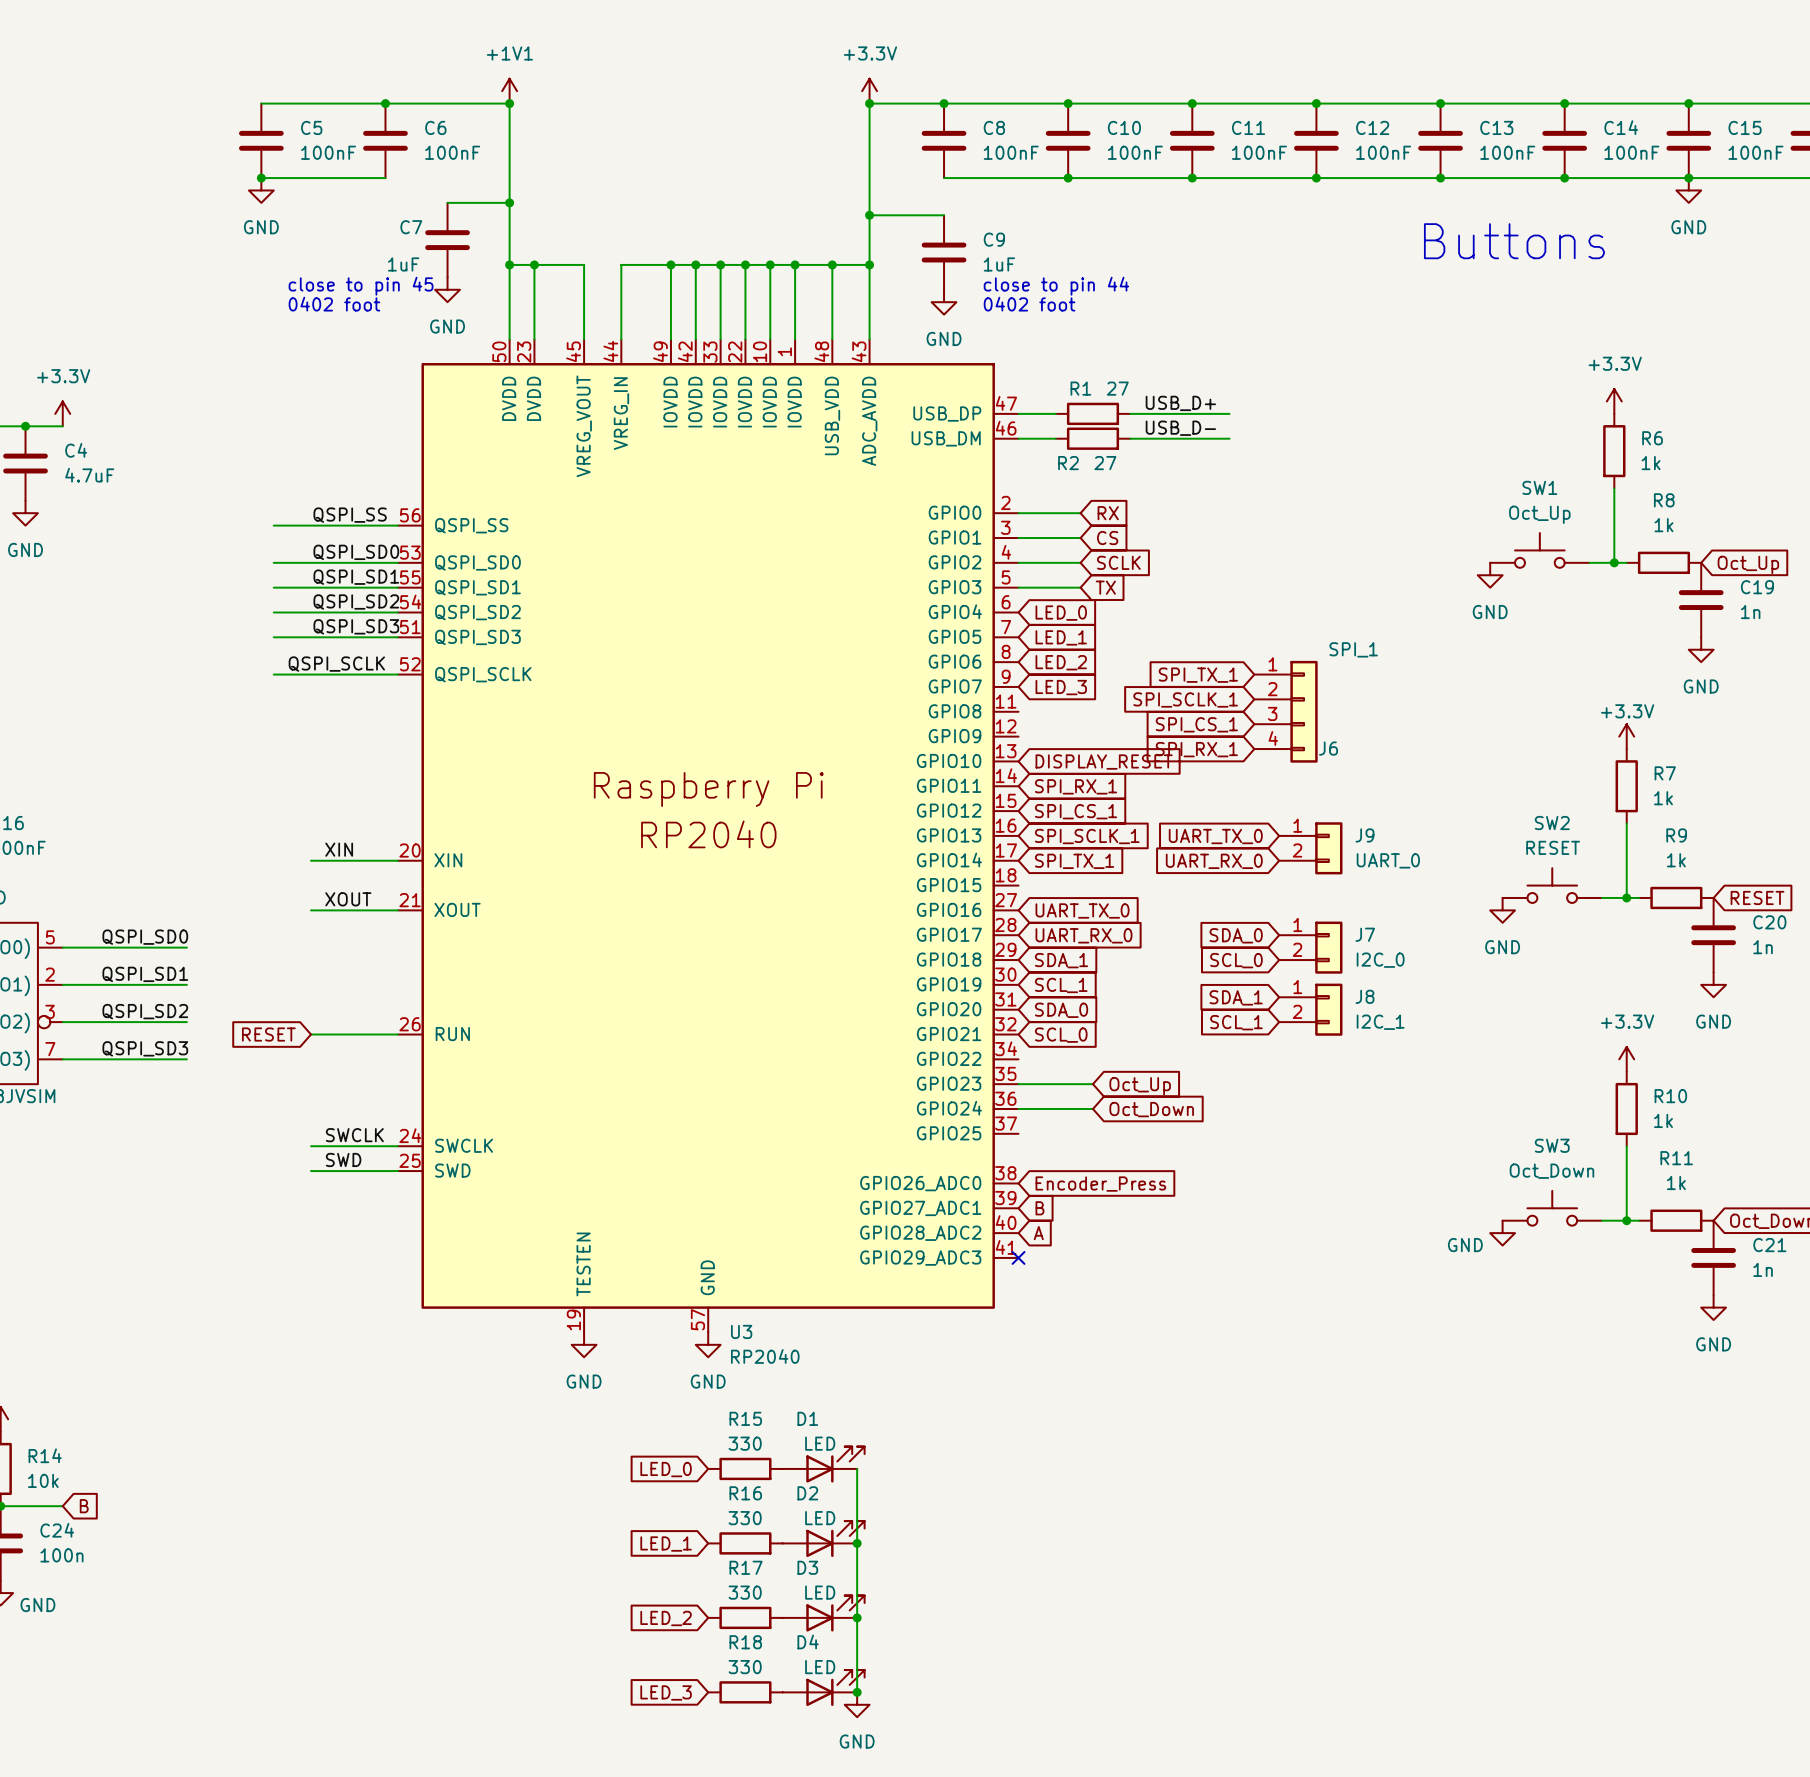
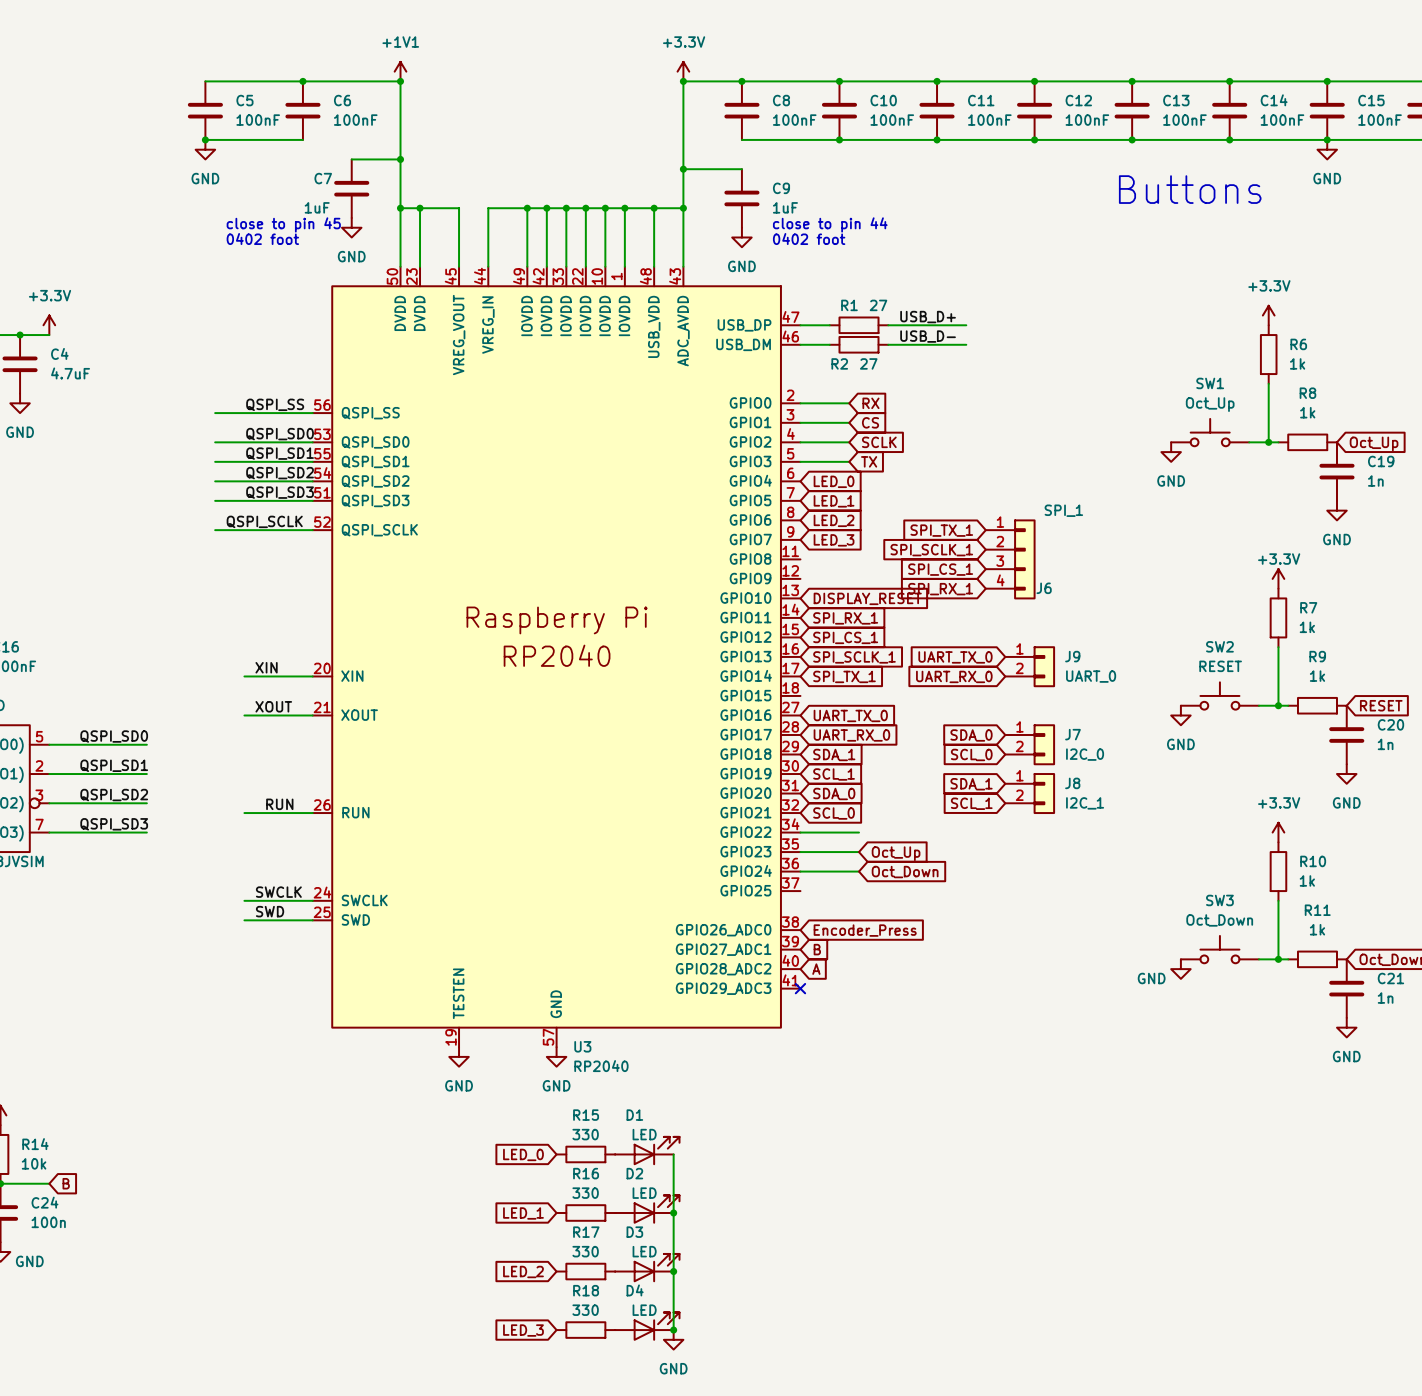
label: none -> RUN (279, 804)
global label: RESET (268, 1034) -> none
wire: none -> (800, 832) (858, 832)

